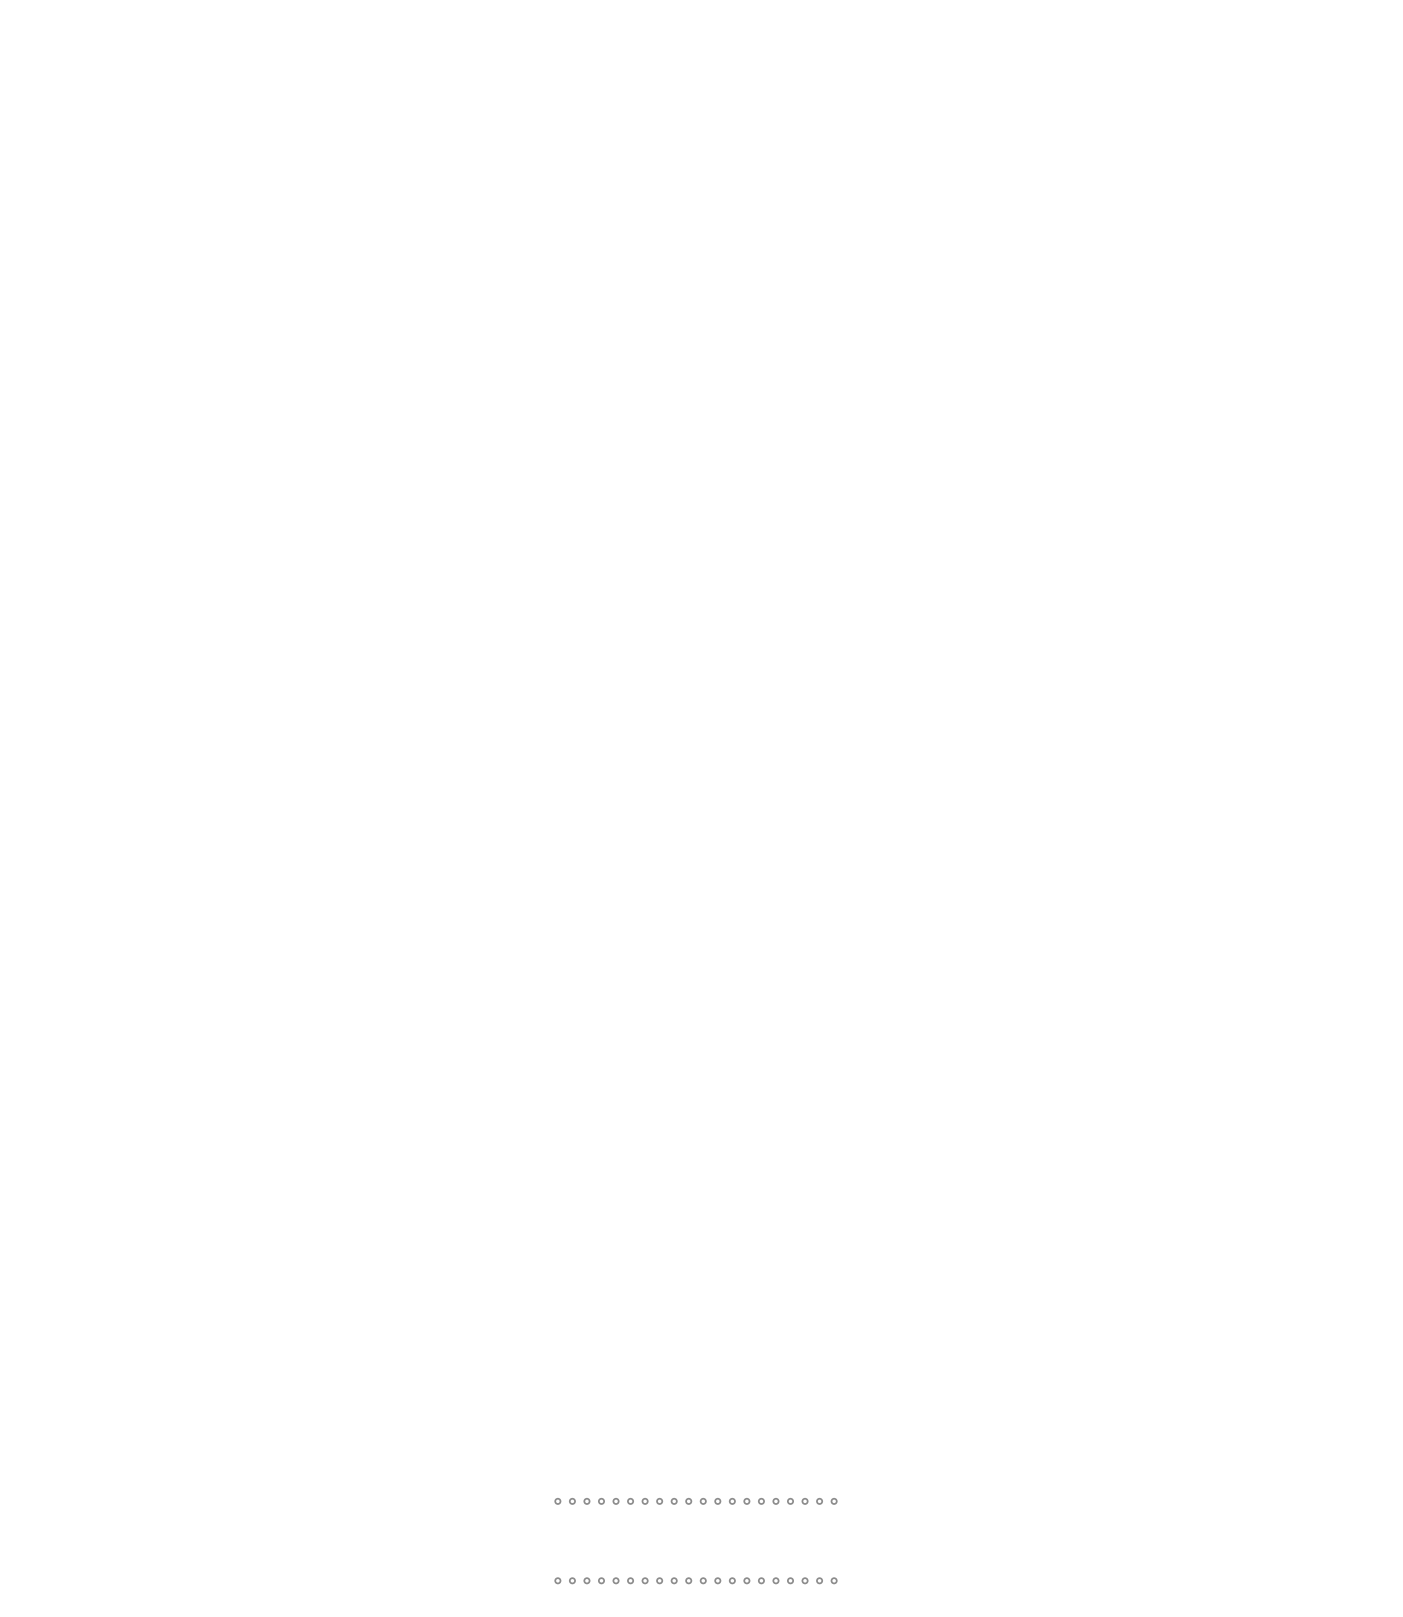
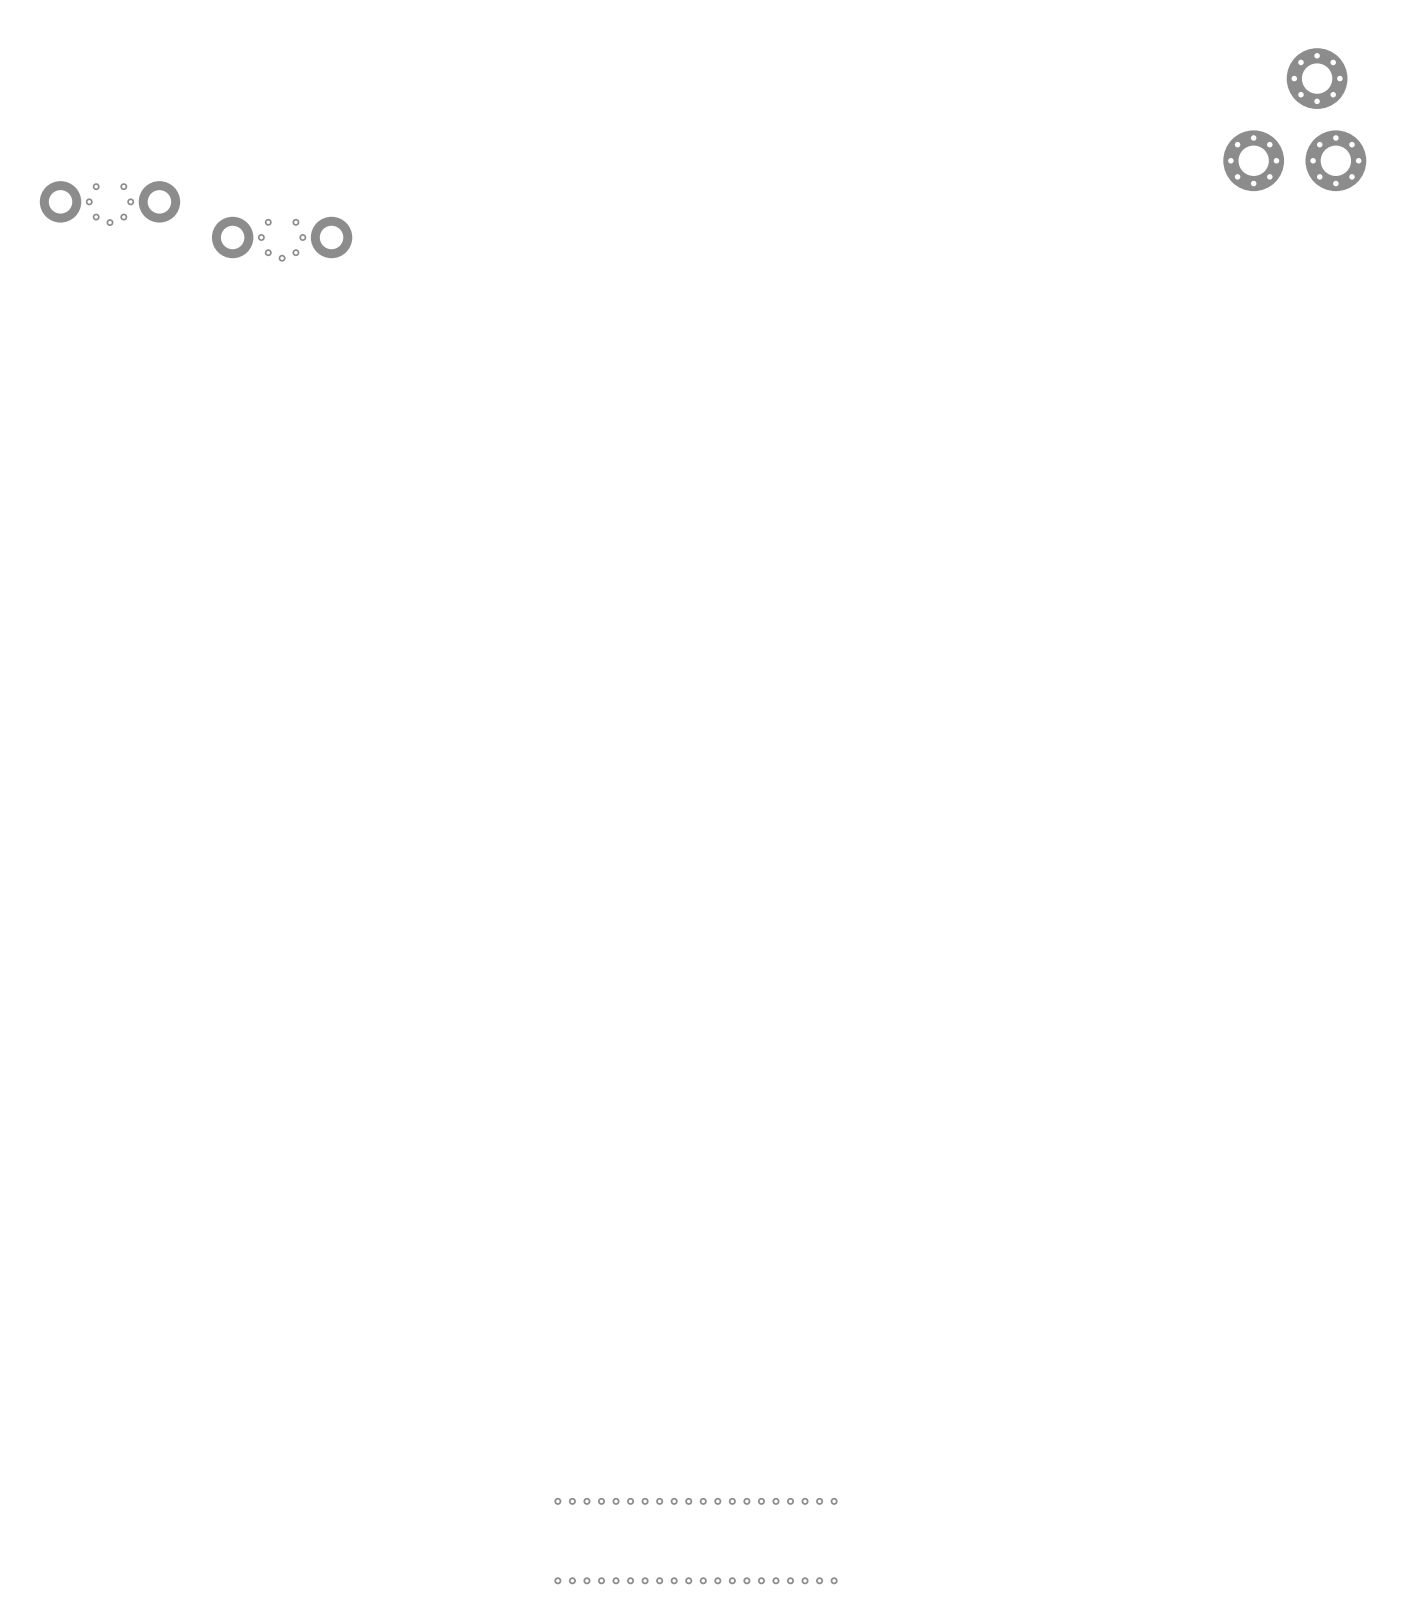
part: none -> (1317, 78)
part: none -> (1253, 160)
part: none -> (1335, 160)
part: none -> (109, 203)
part: none -> (282, 239)

